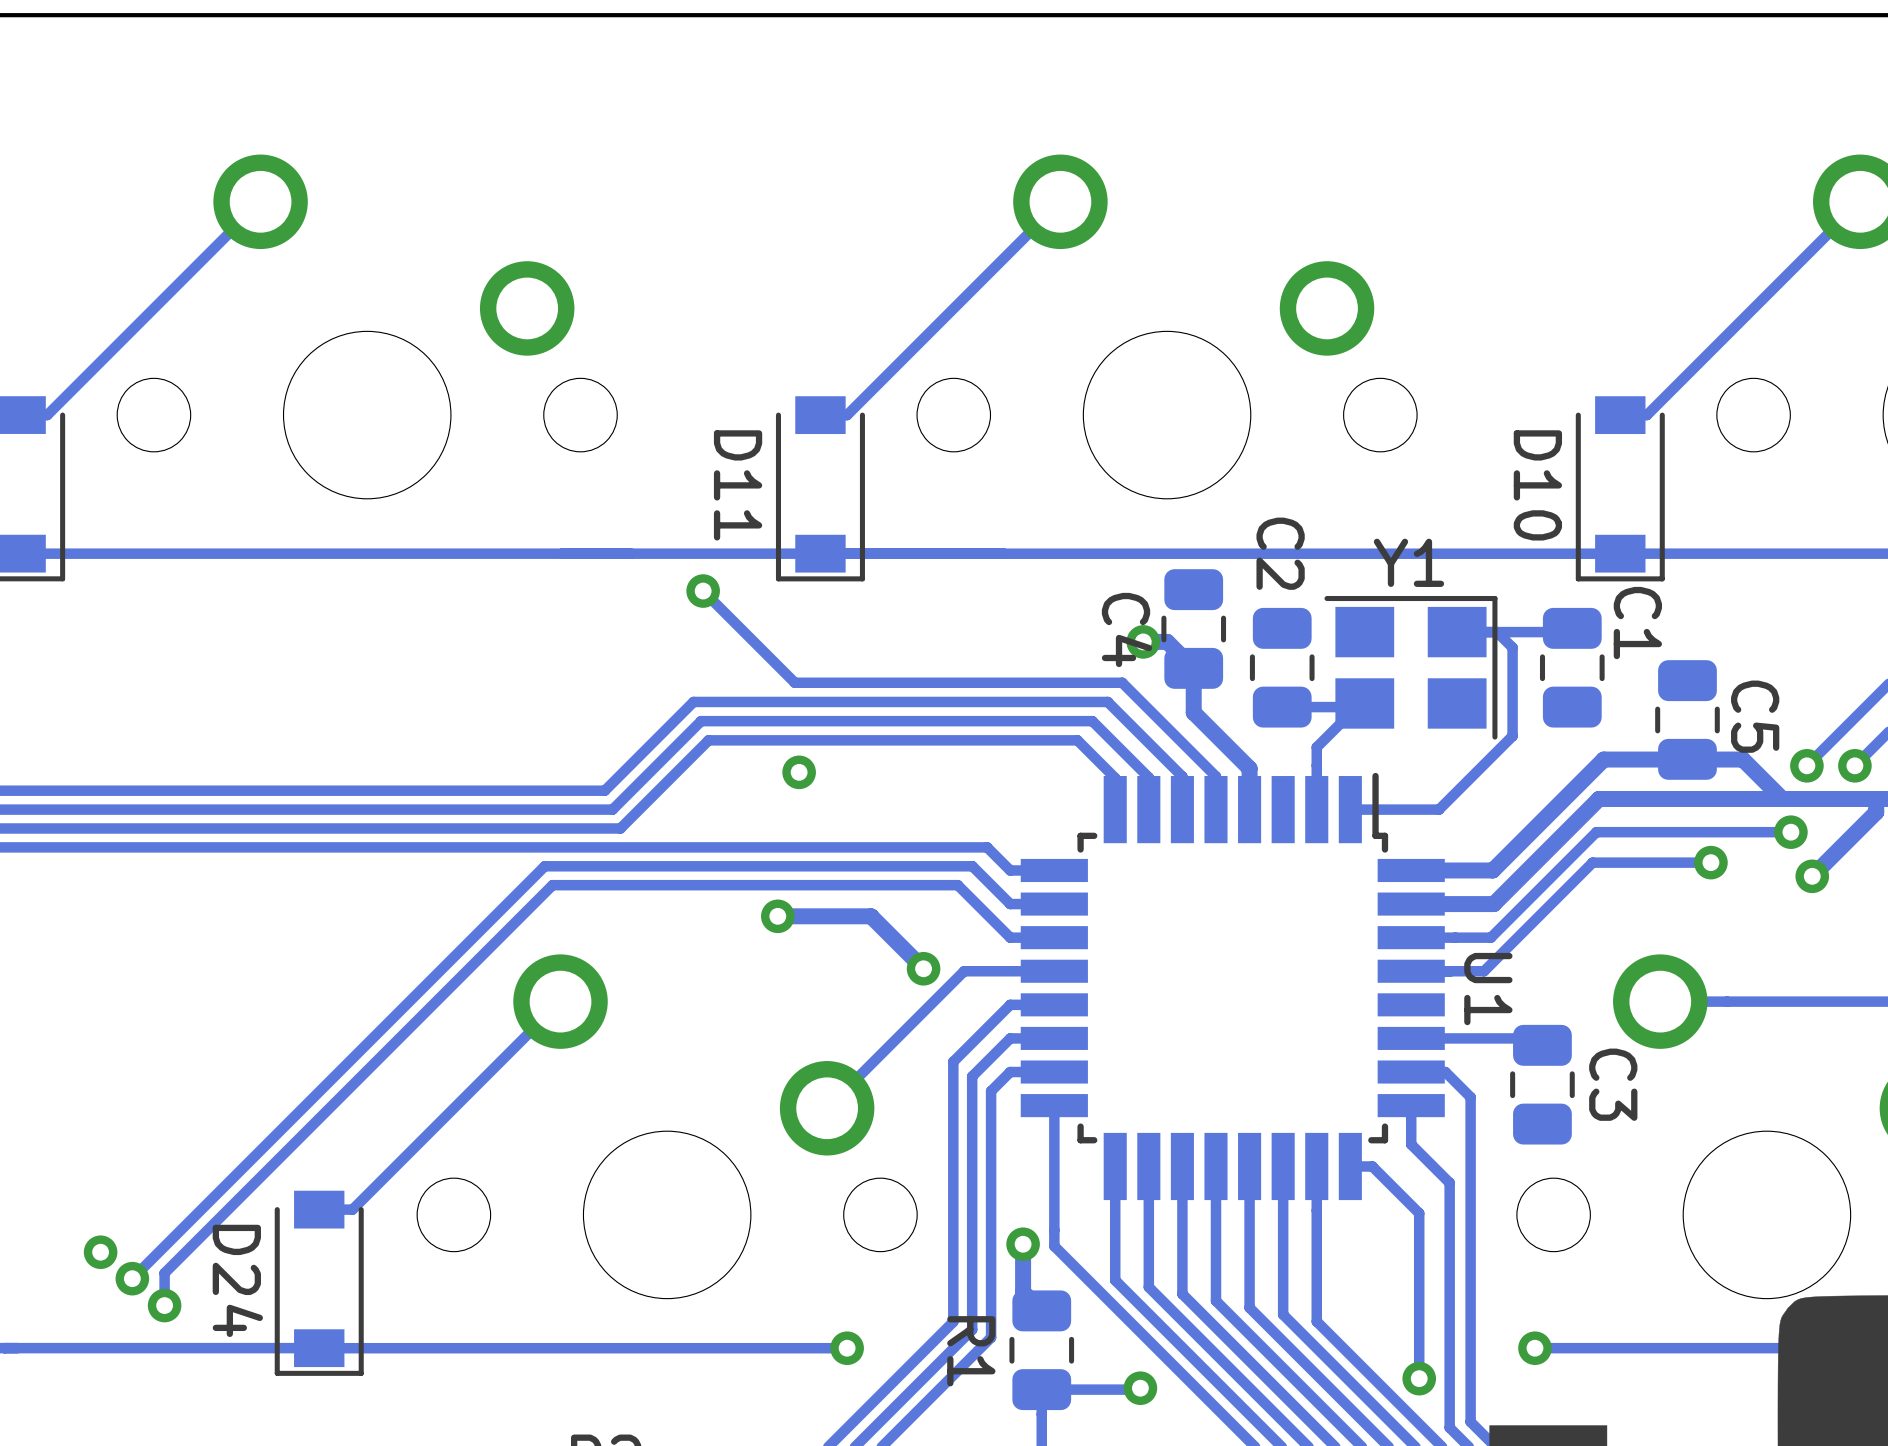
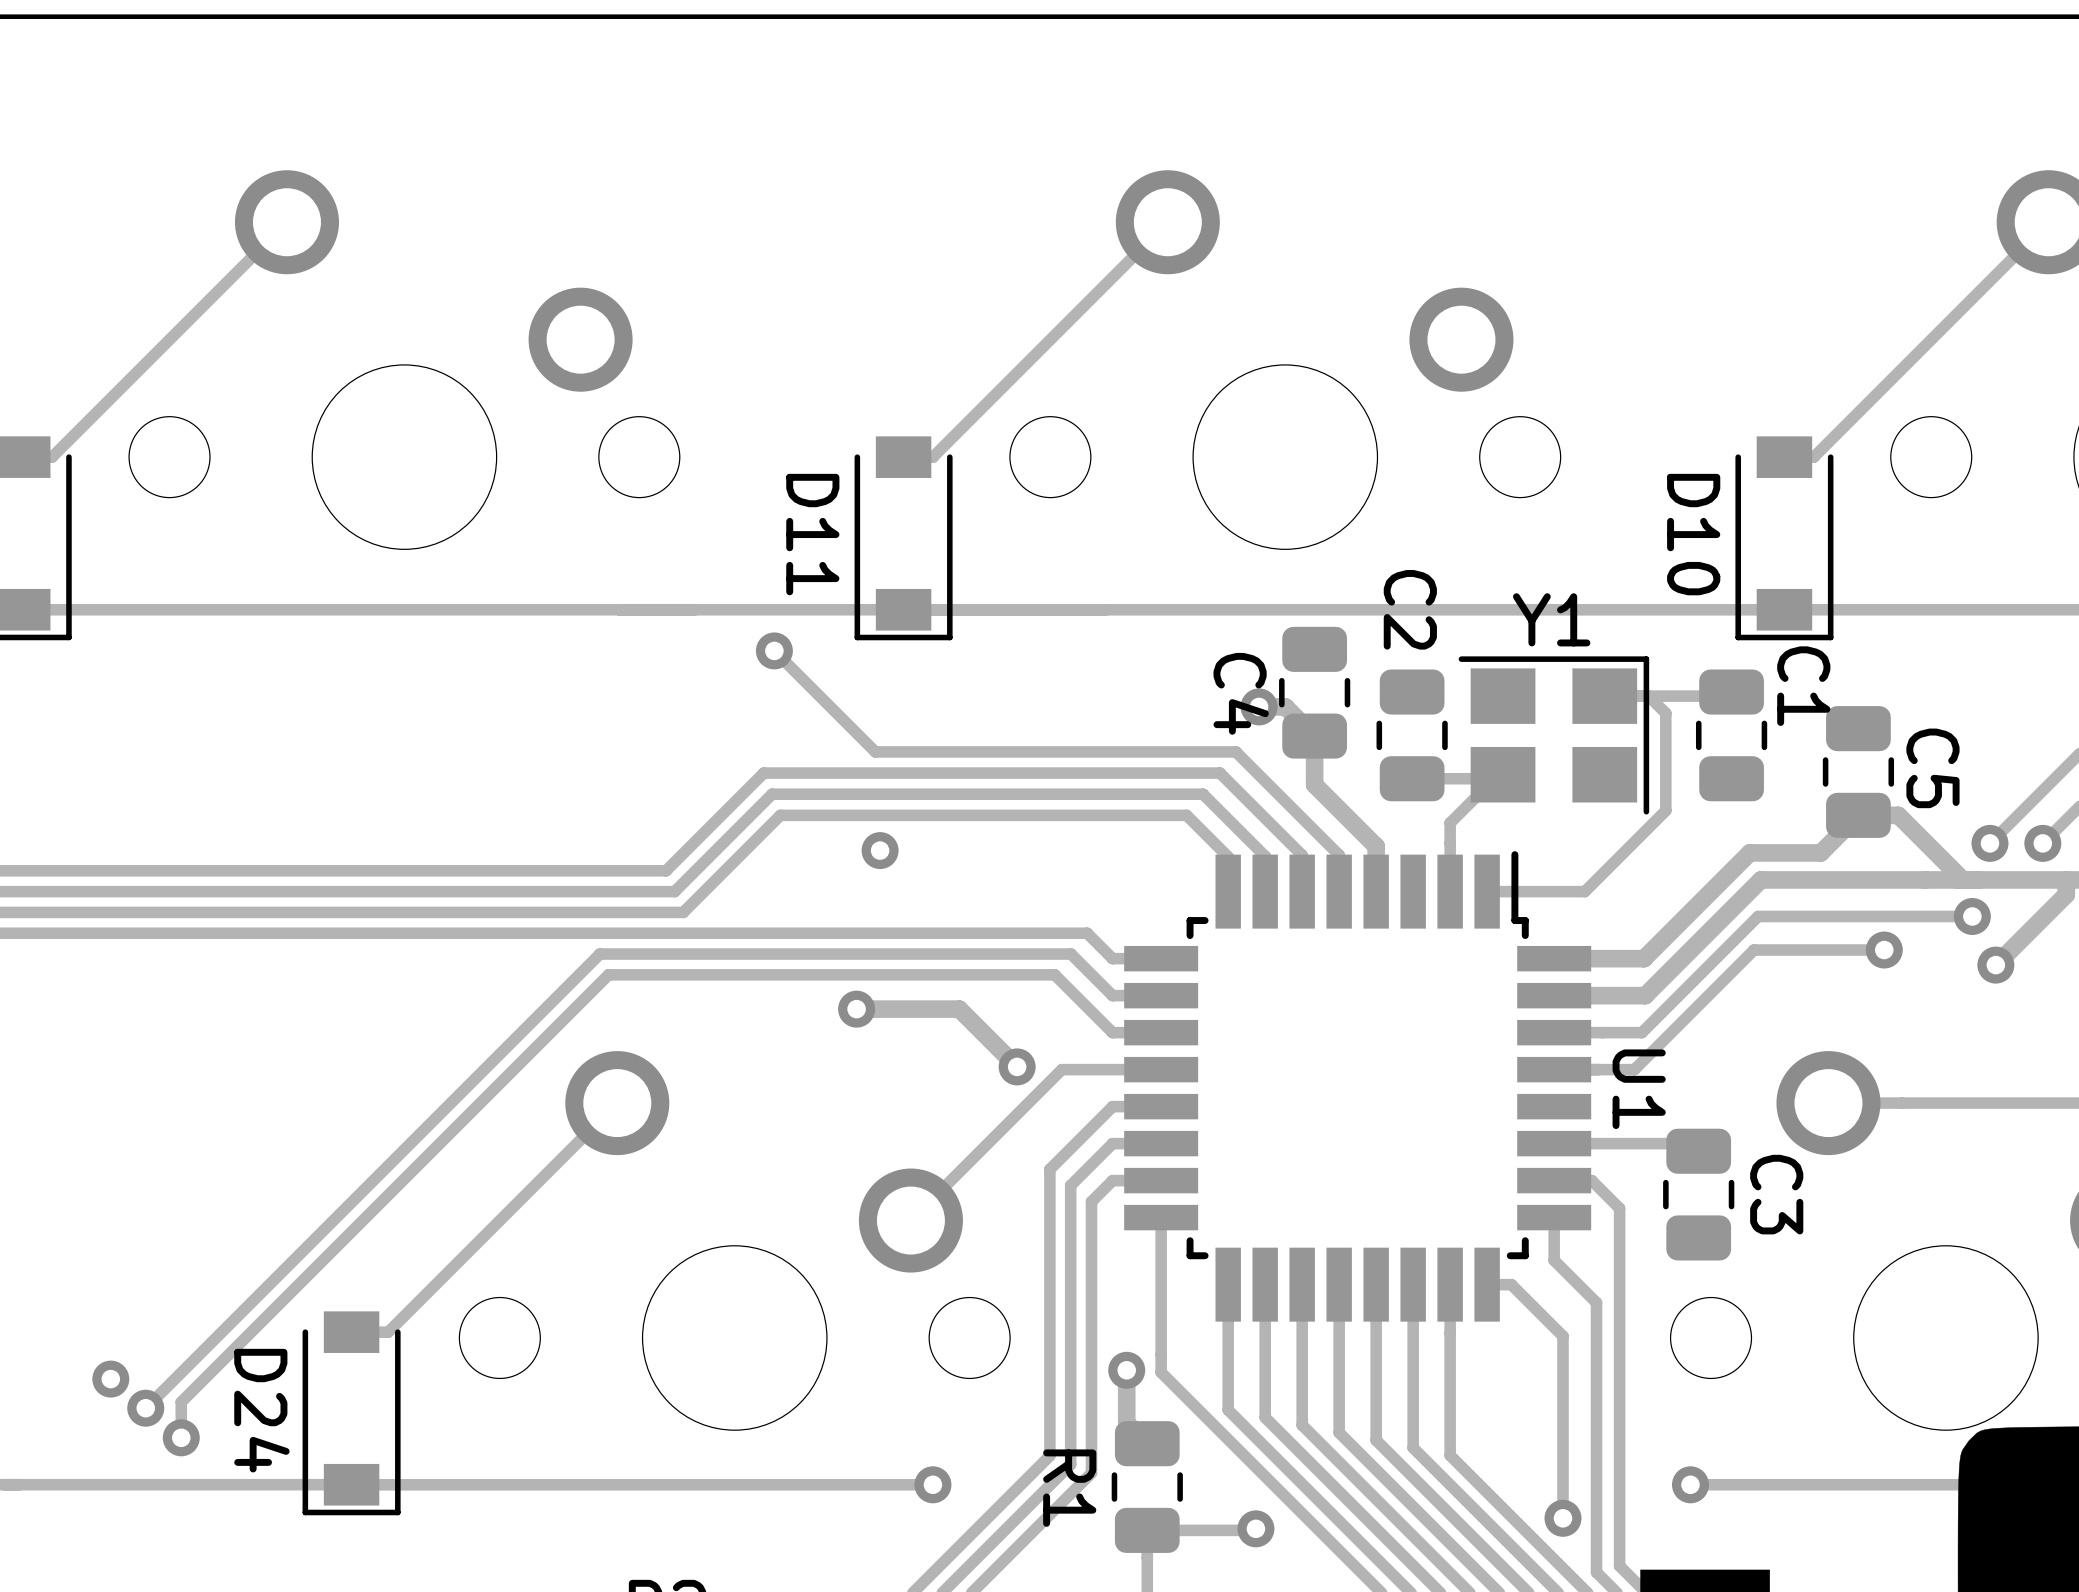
C5 position: (1687, 719) -> (1858, 772)
track: (1742, 759) (1603, 759) (1588, 774) -> (1919, 836) (1898, 815) (1858, 815) (1820, 852) (1749, 852)

